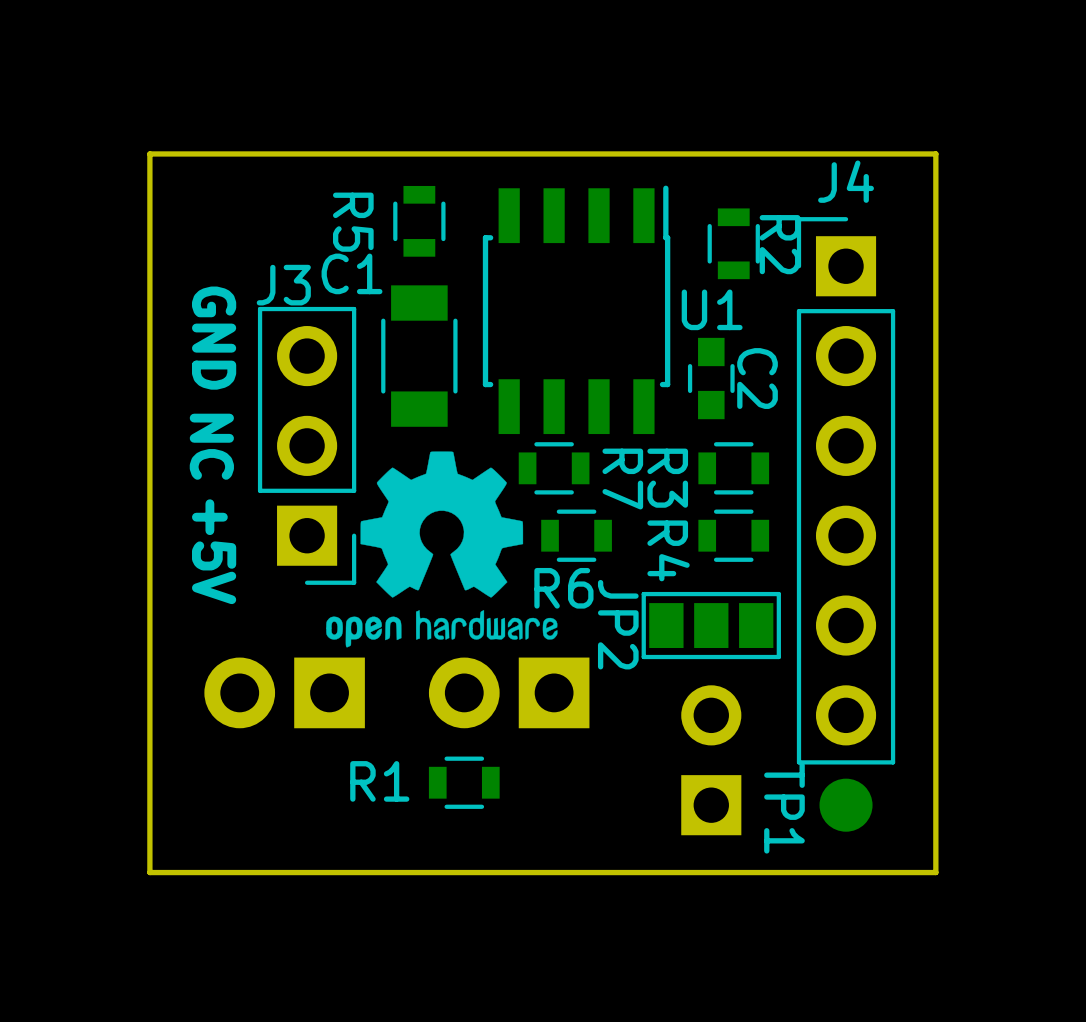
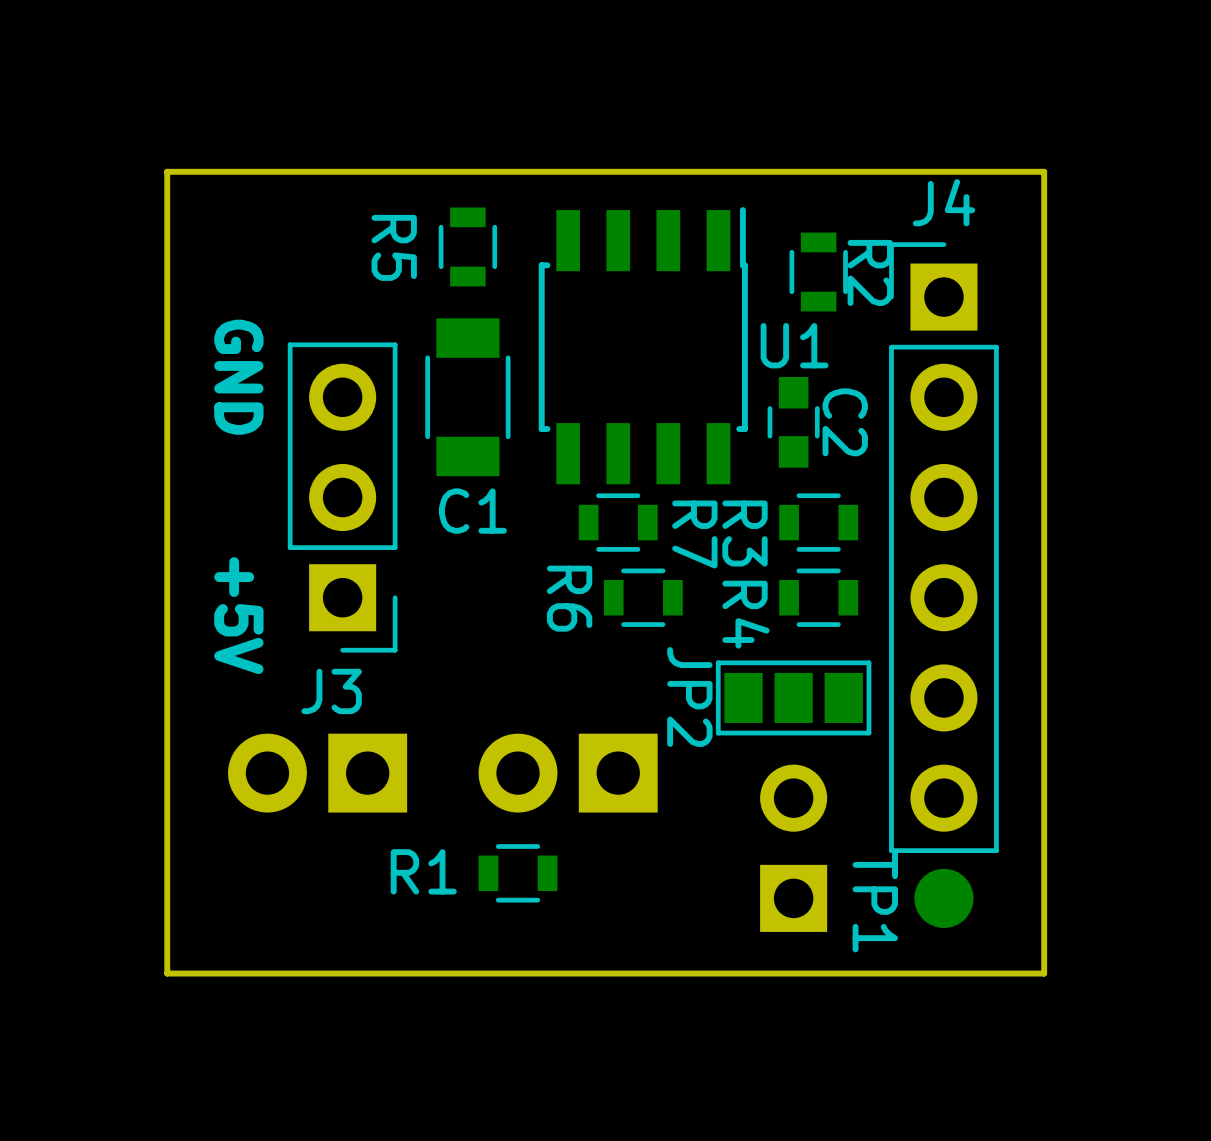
C1 name position: C1 (352, 273) -> C1 (472, 511)
J3 name position: J3 (283, 285) -> J3 (331, 691)
text: NC (211, 446) -> none
drawing: [326, 451, 558, 648] -> none
R6 name rotation: 0° (563, 588) -> 90° clockwise (569, 598)

